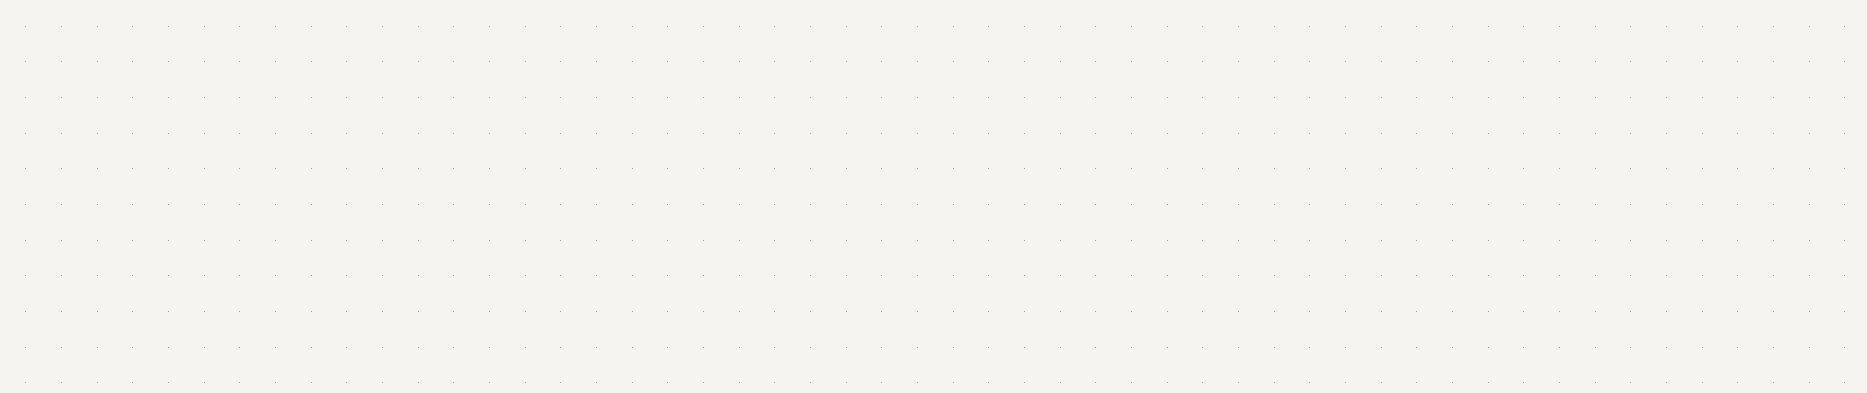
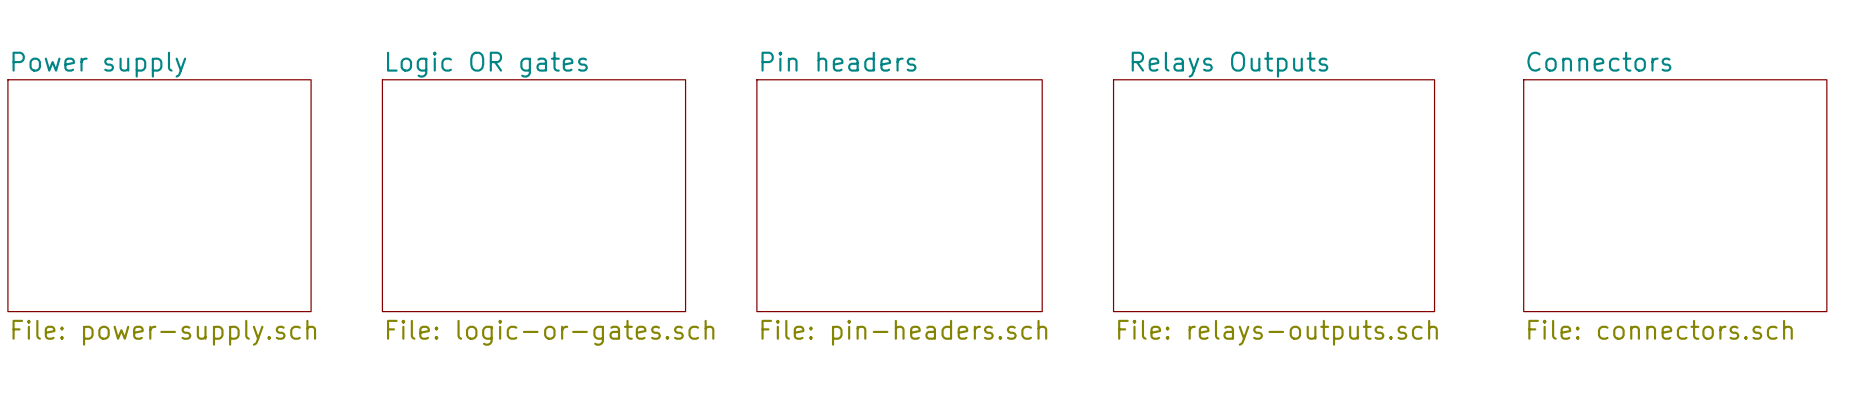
sheet Power supply: none -> File: power-supply.sch (159, 195)
sheet Logic OR gates: none -> File: logic-or-gates.sch (533, 195)
sheet Pin headers: none -> File: pin-headers.sch (899, 195)
sheet Relays Outputs: none -> File: relays-outputs.sch (1274, 195)
sheet Connectors: none -> File: connectors.sch (1675, 195)

